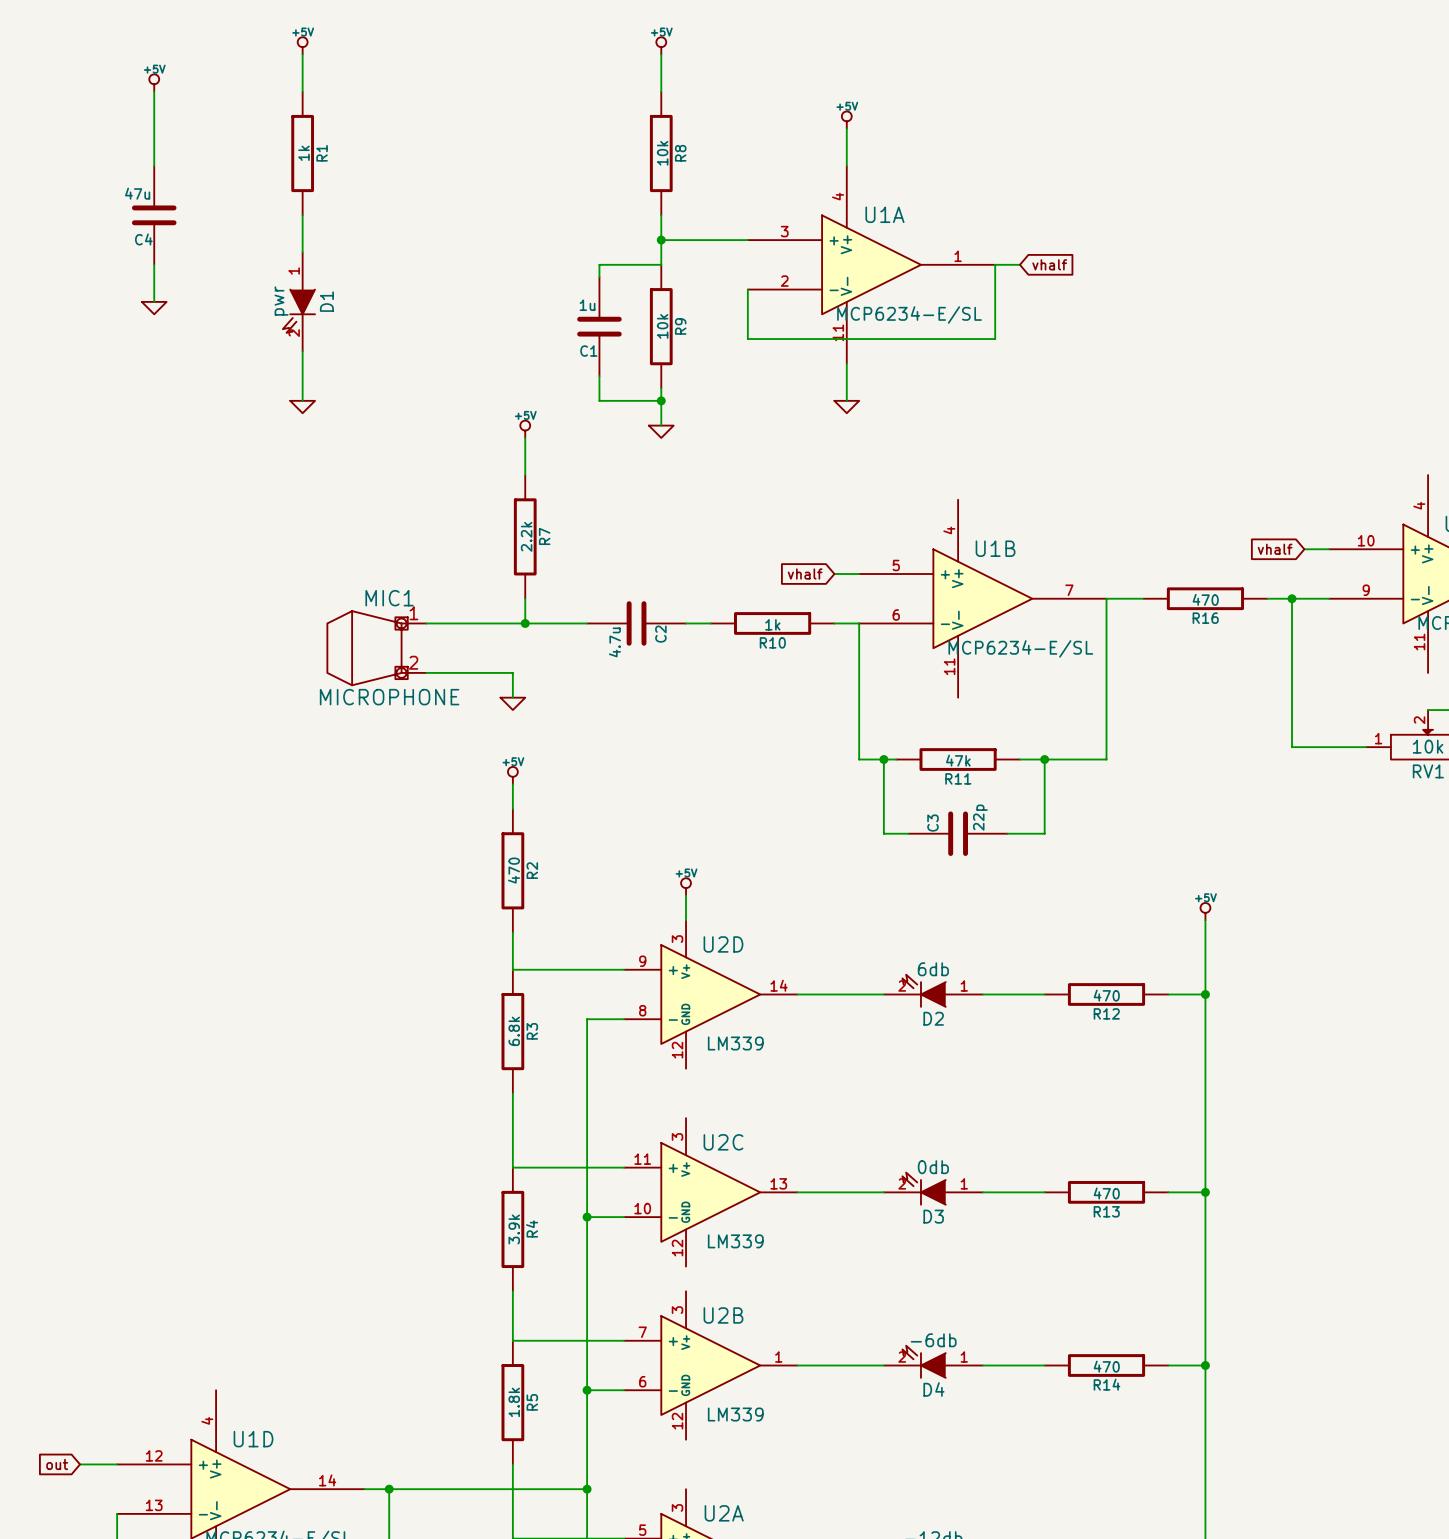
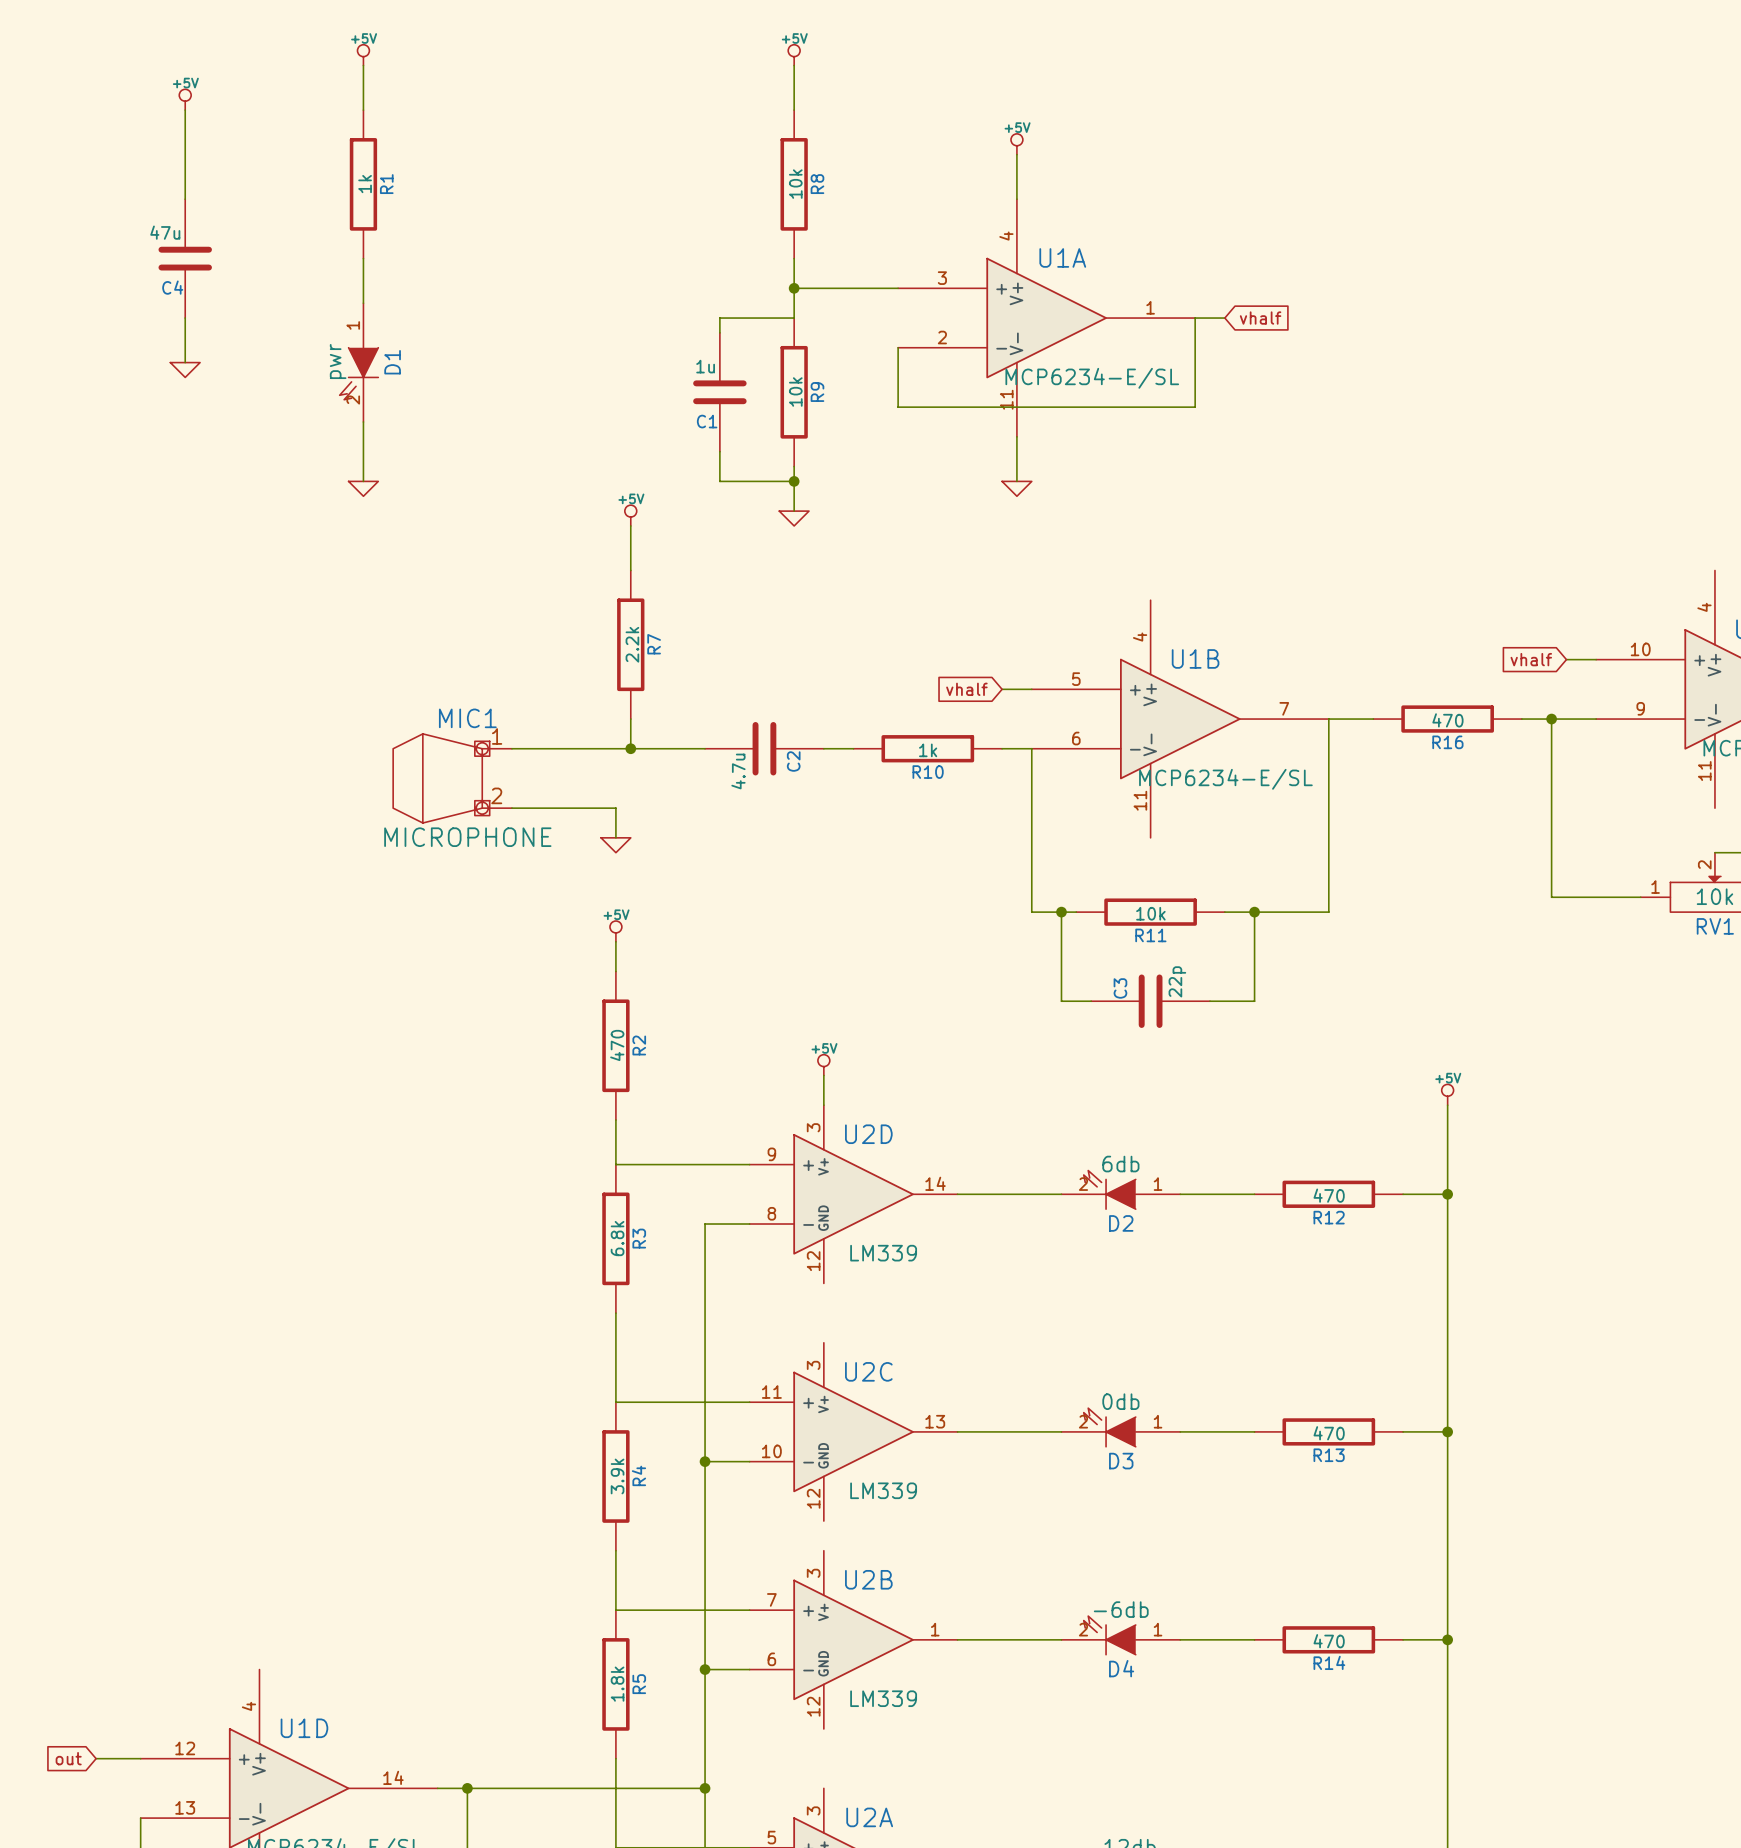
R11 value: 47k (958, 760) -> 10k (1150, 913)

